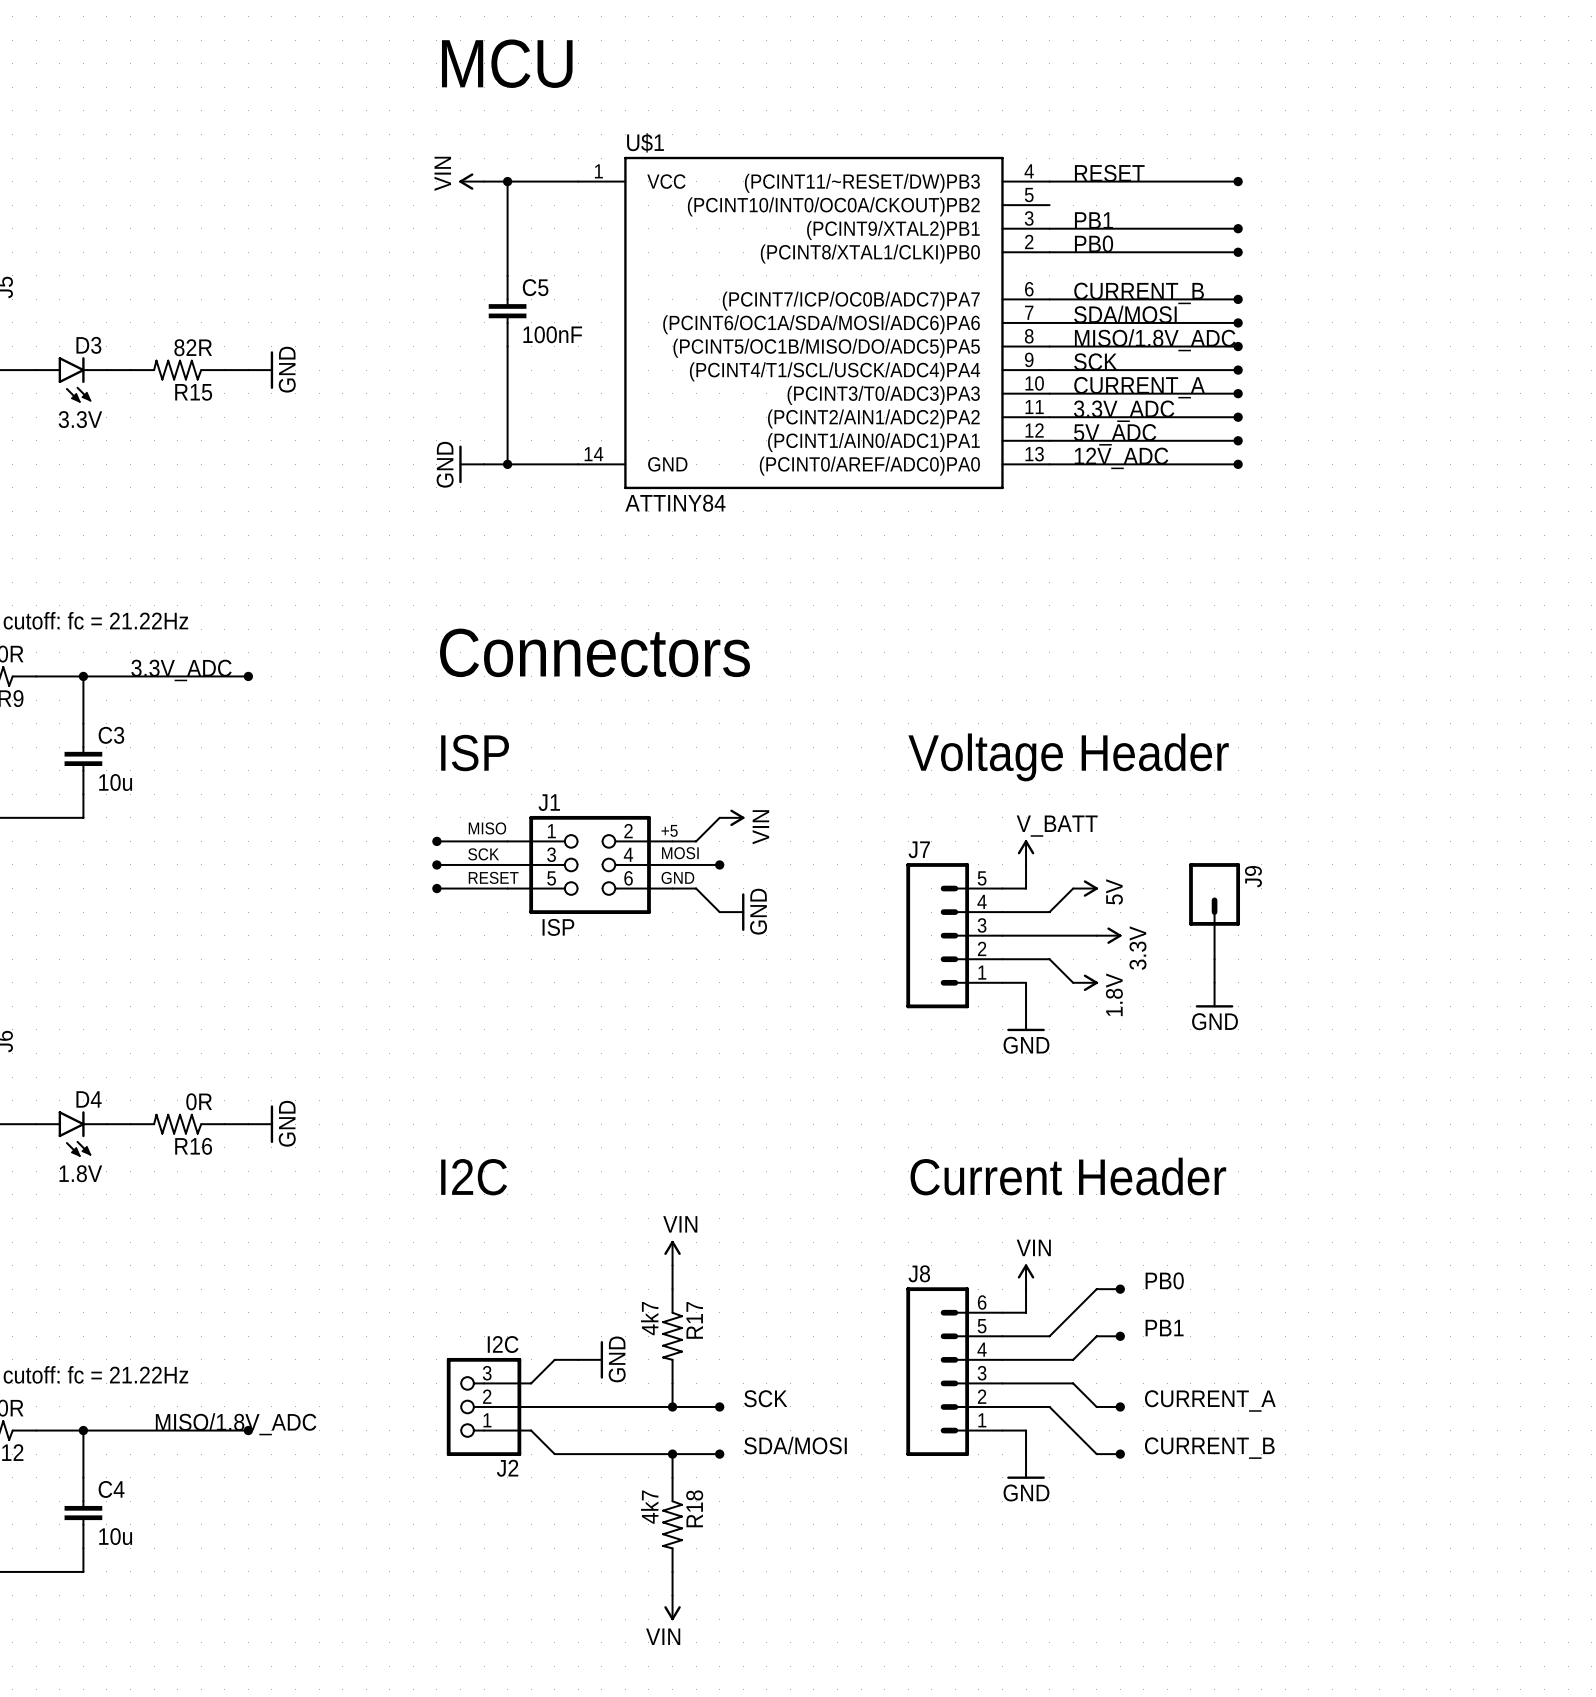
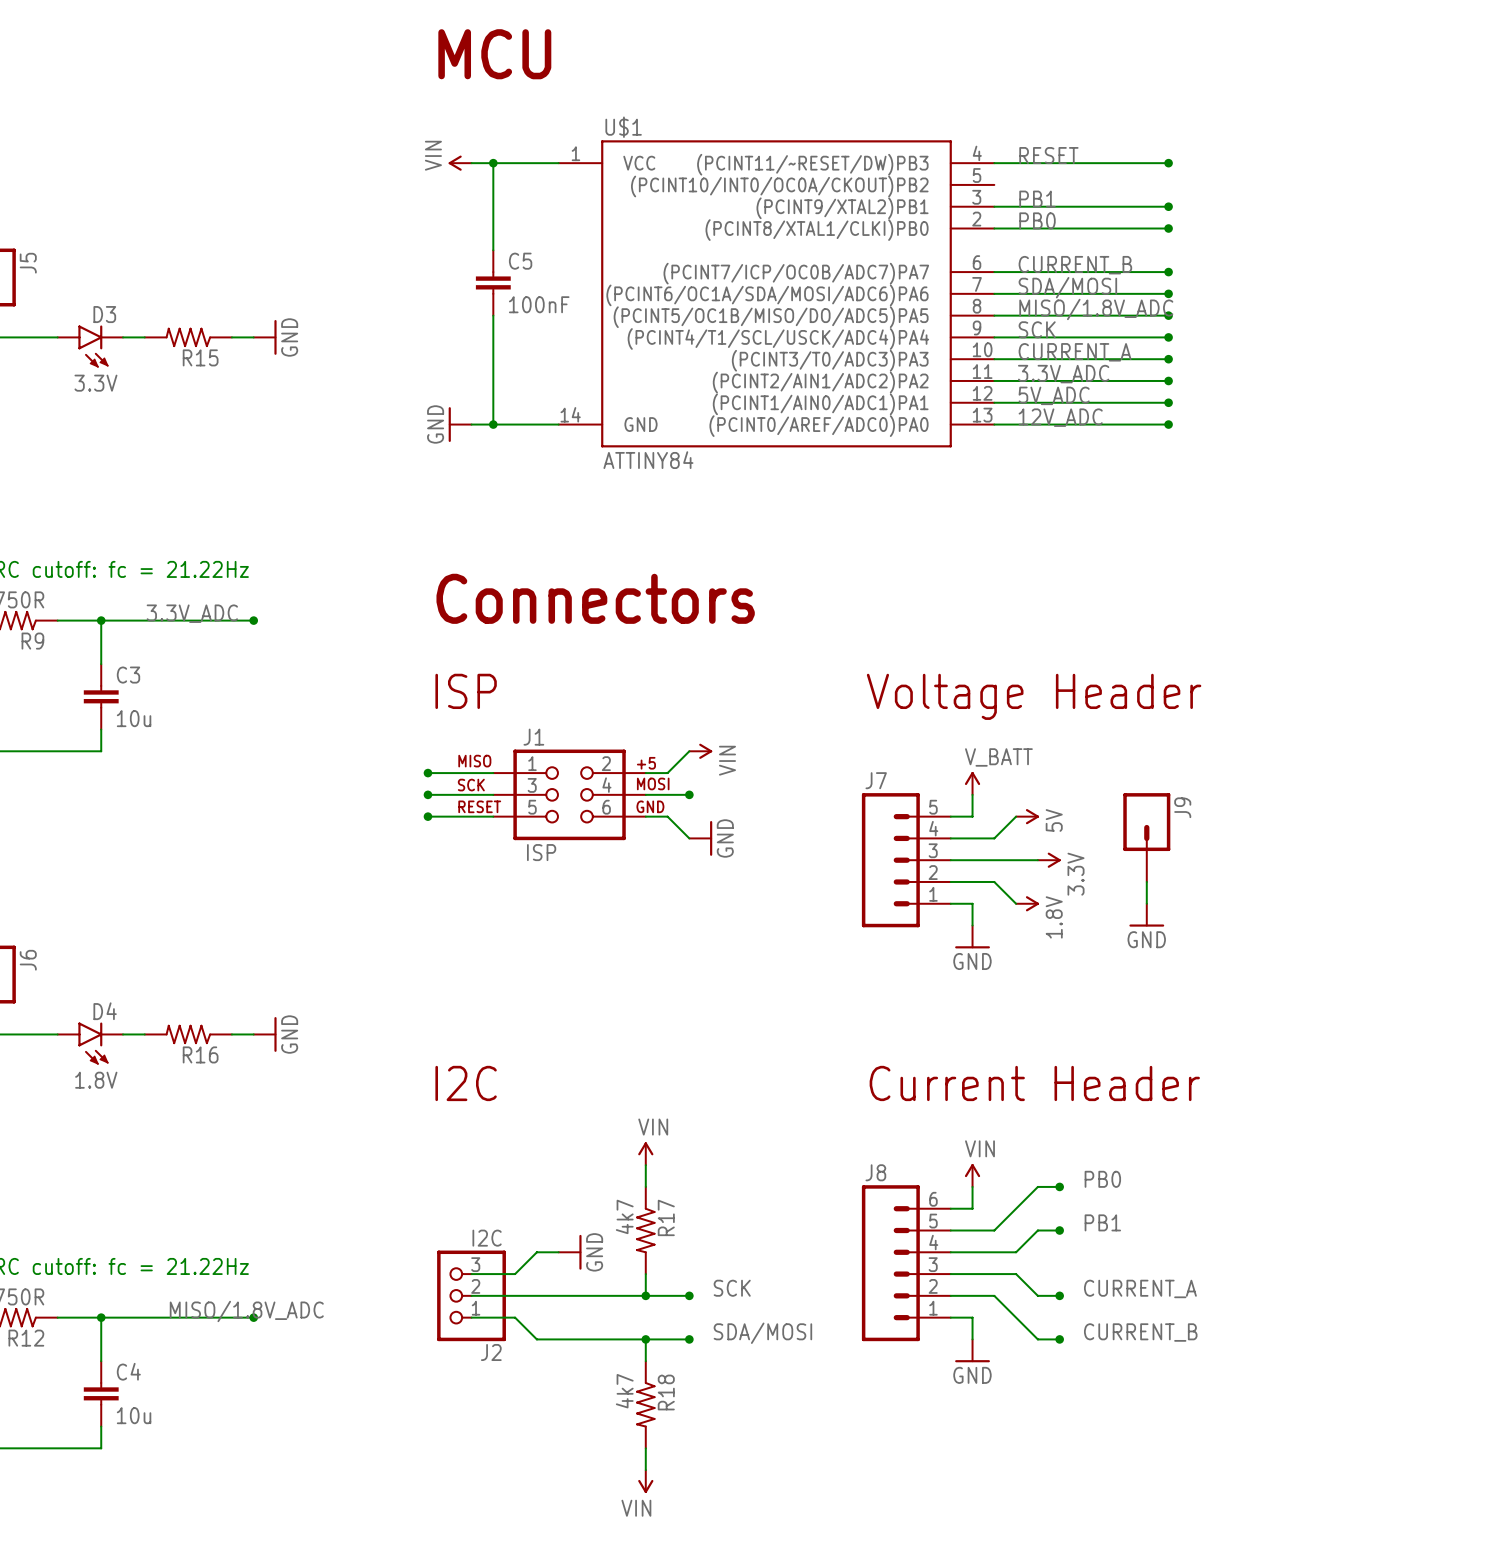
R15 value: 82R (193, 347) -> none
R16 value: 0R (199, 1101) -> none

